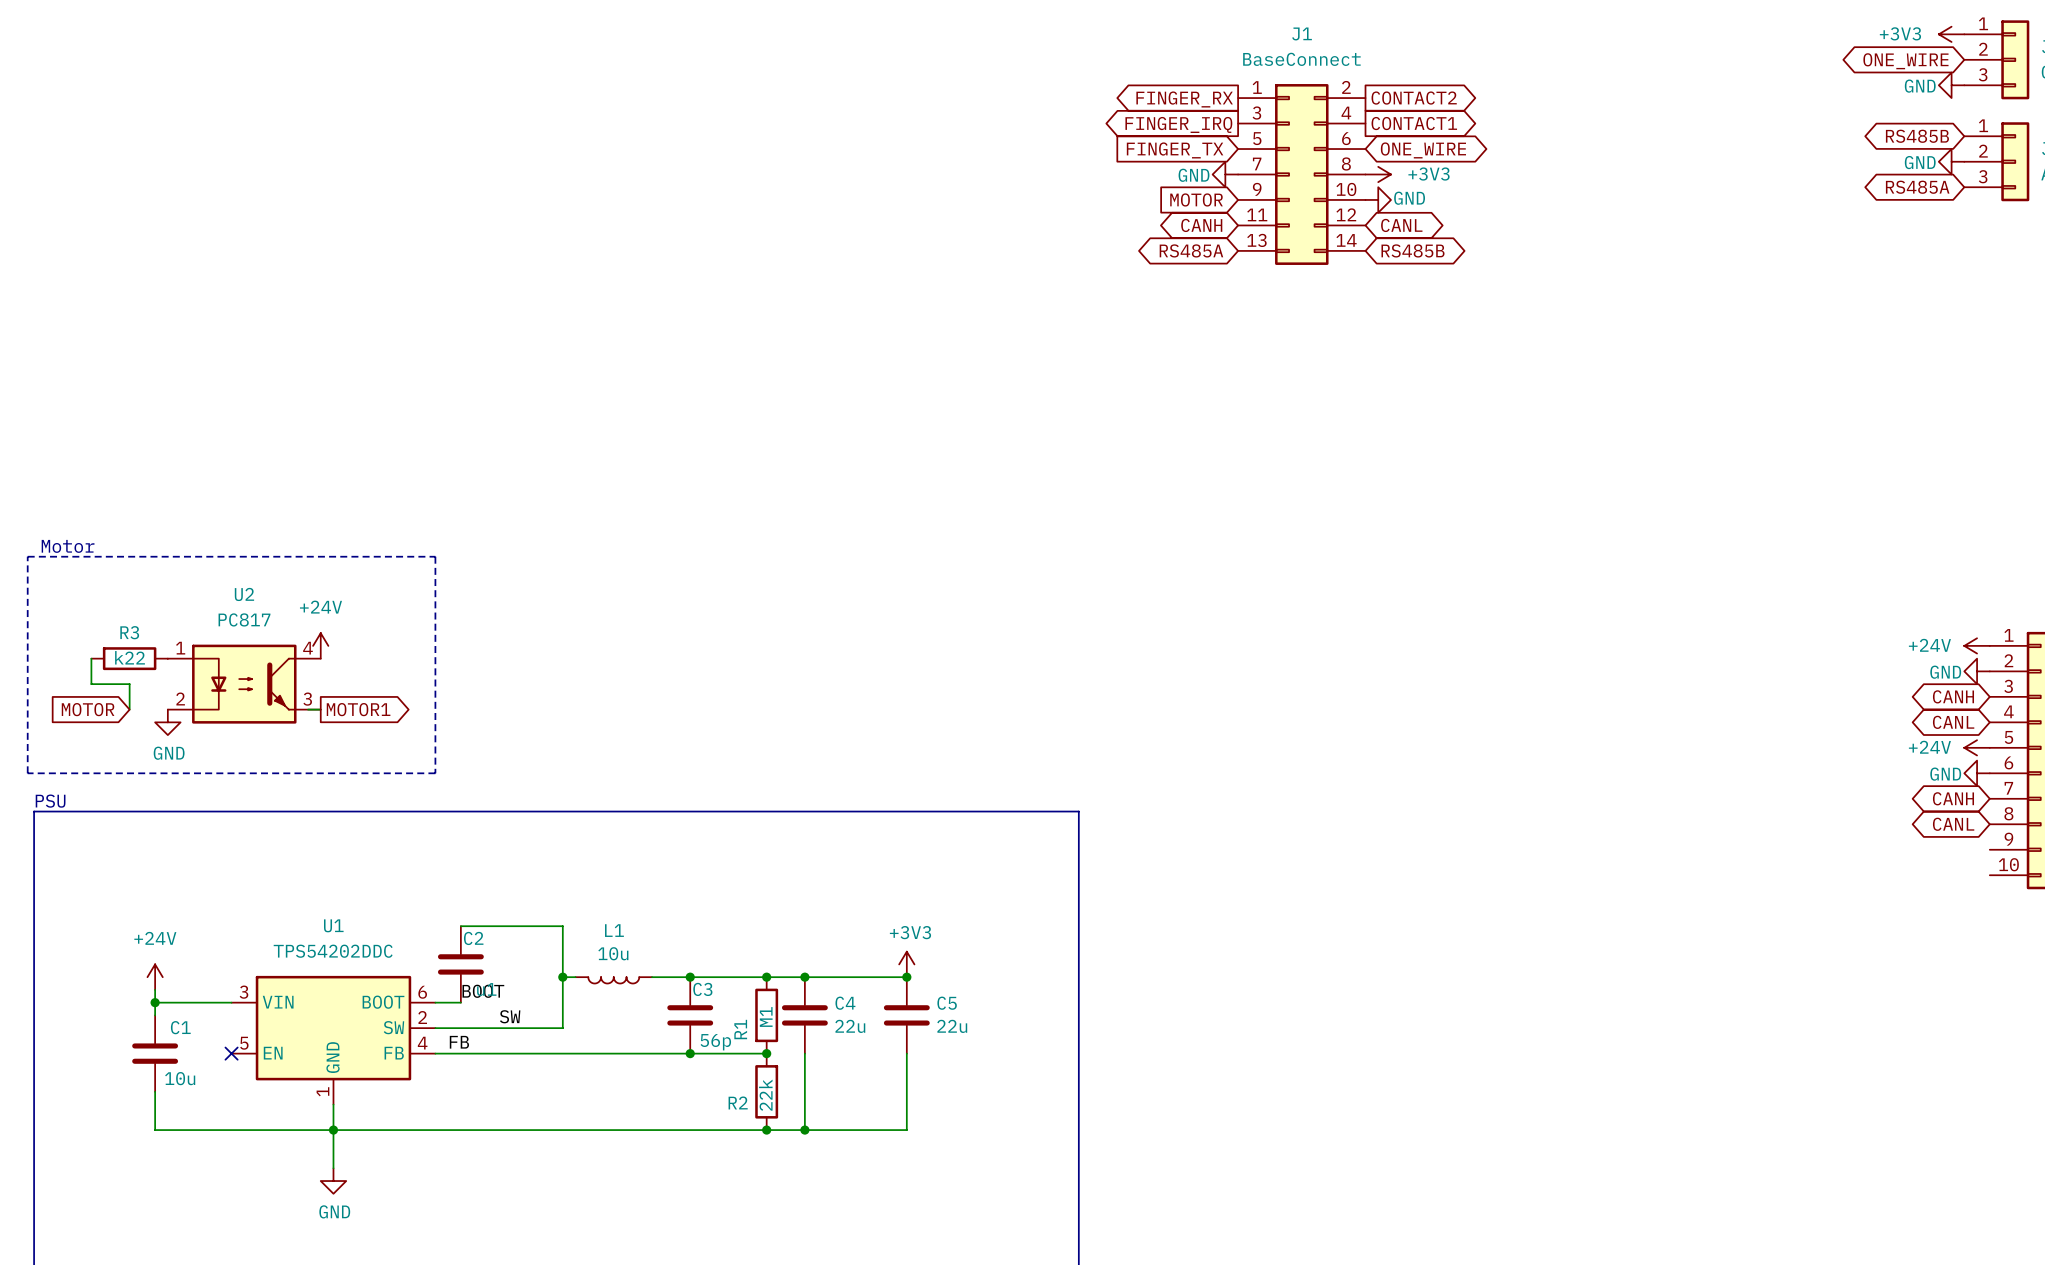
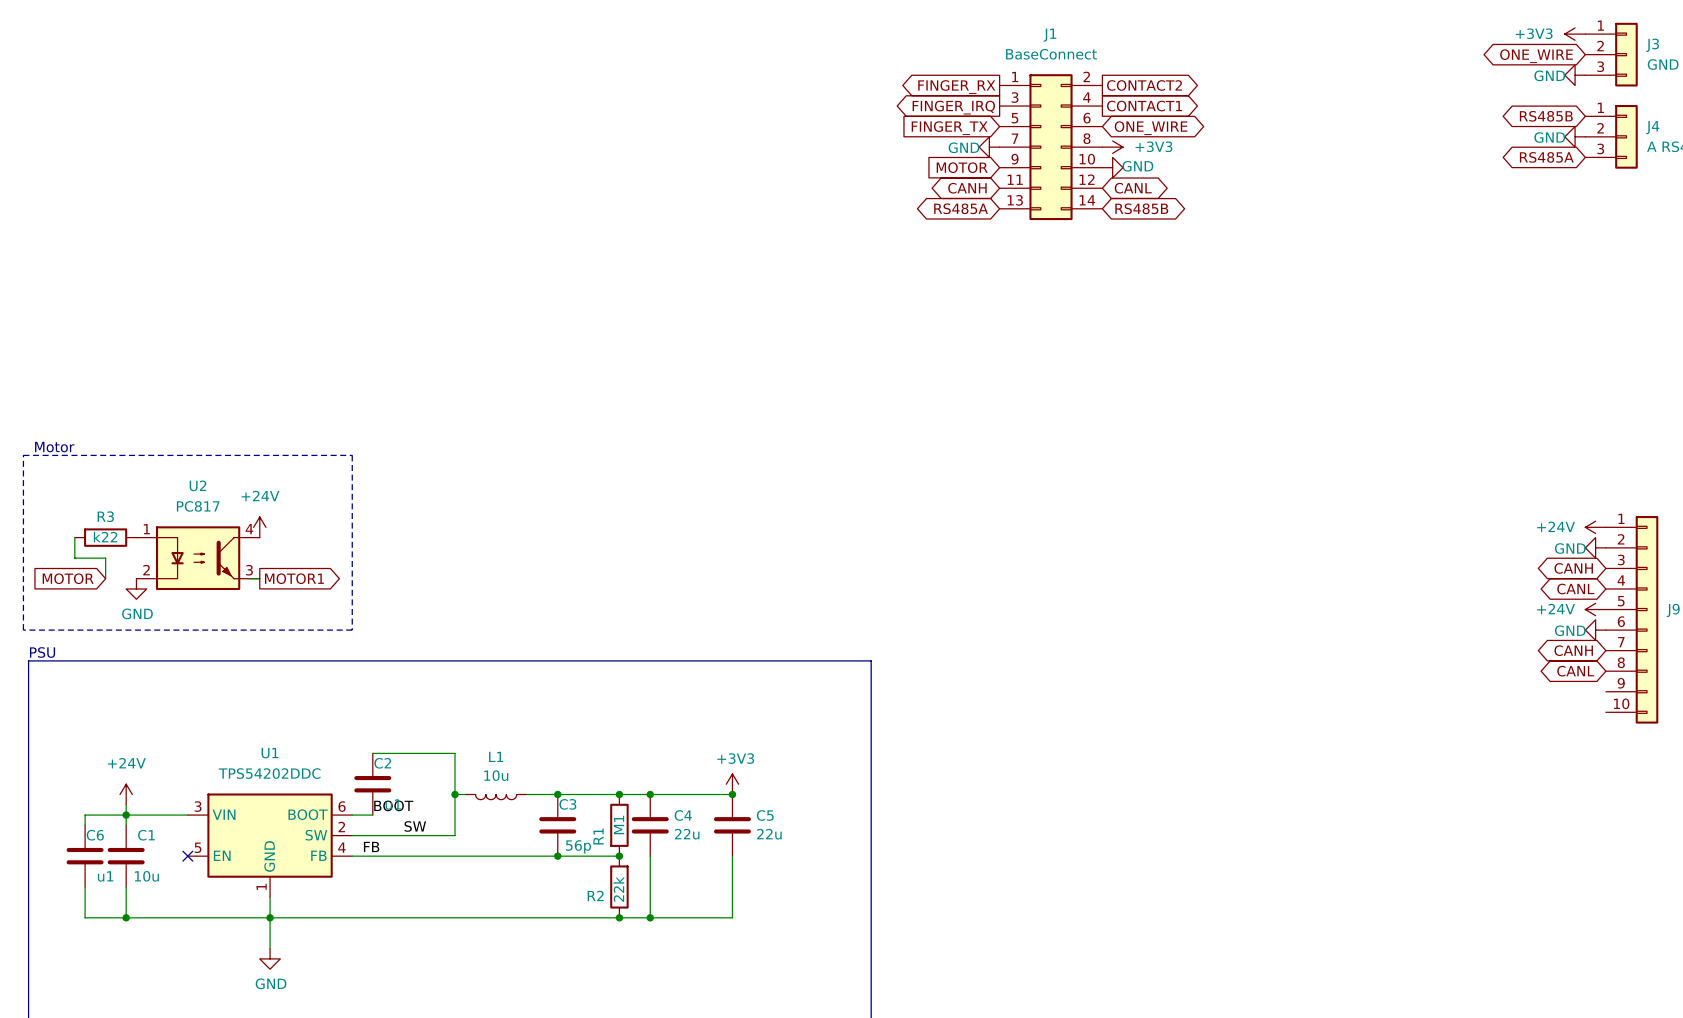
wire: none -> (126, 815) (85, 815) (85, 825)
C6: none -> u1 (85, 856)
wire: none -> (85, 886) (85, 917) (126, 917)
junction: none -> (126, 917)

